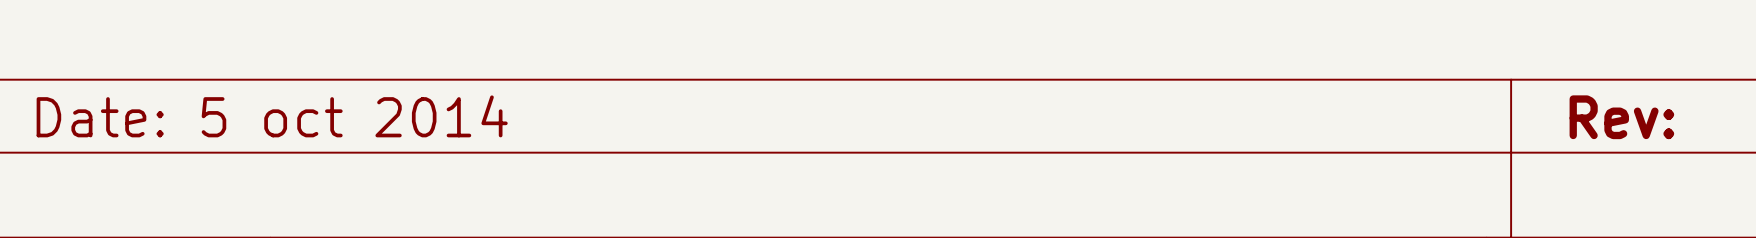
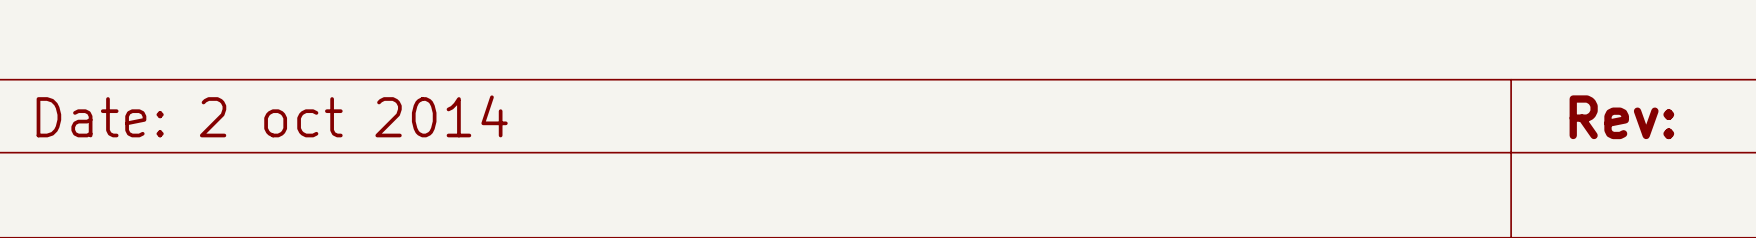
title block: Date: 5 oct 2014 (272, 116) -> Date: 2 oct 2014 (272, 116)

